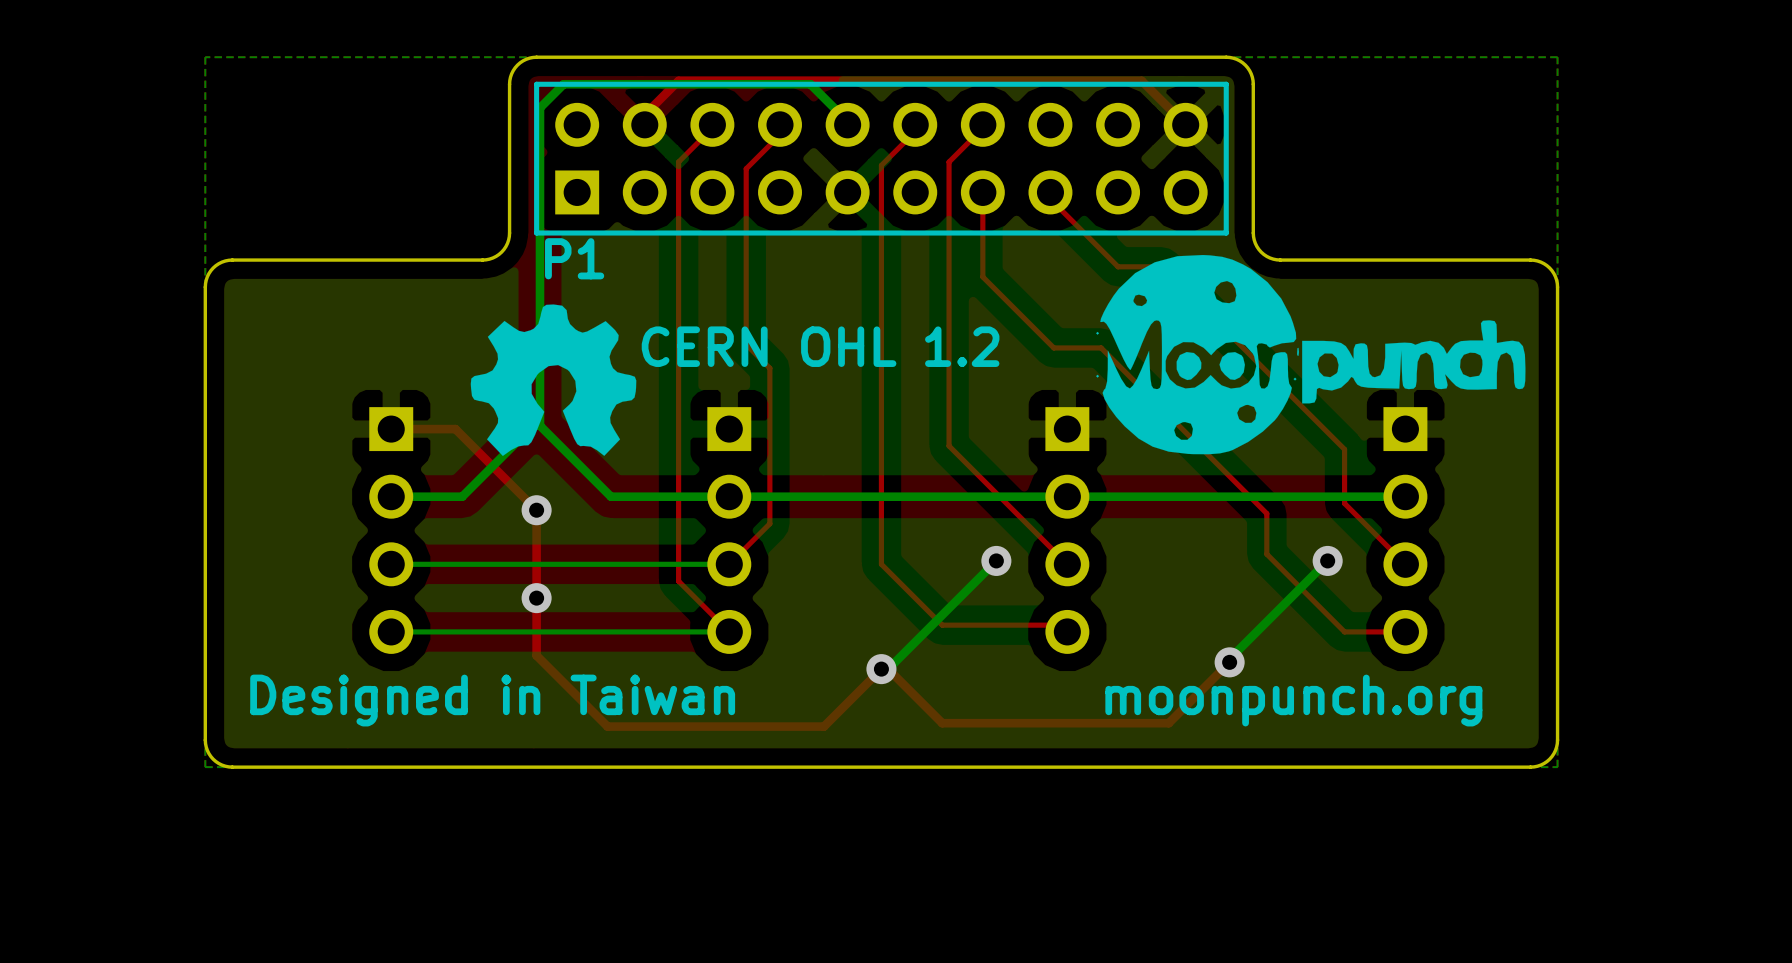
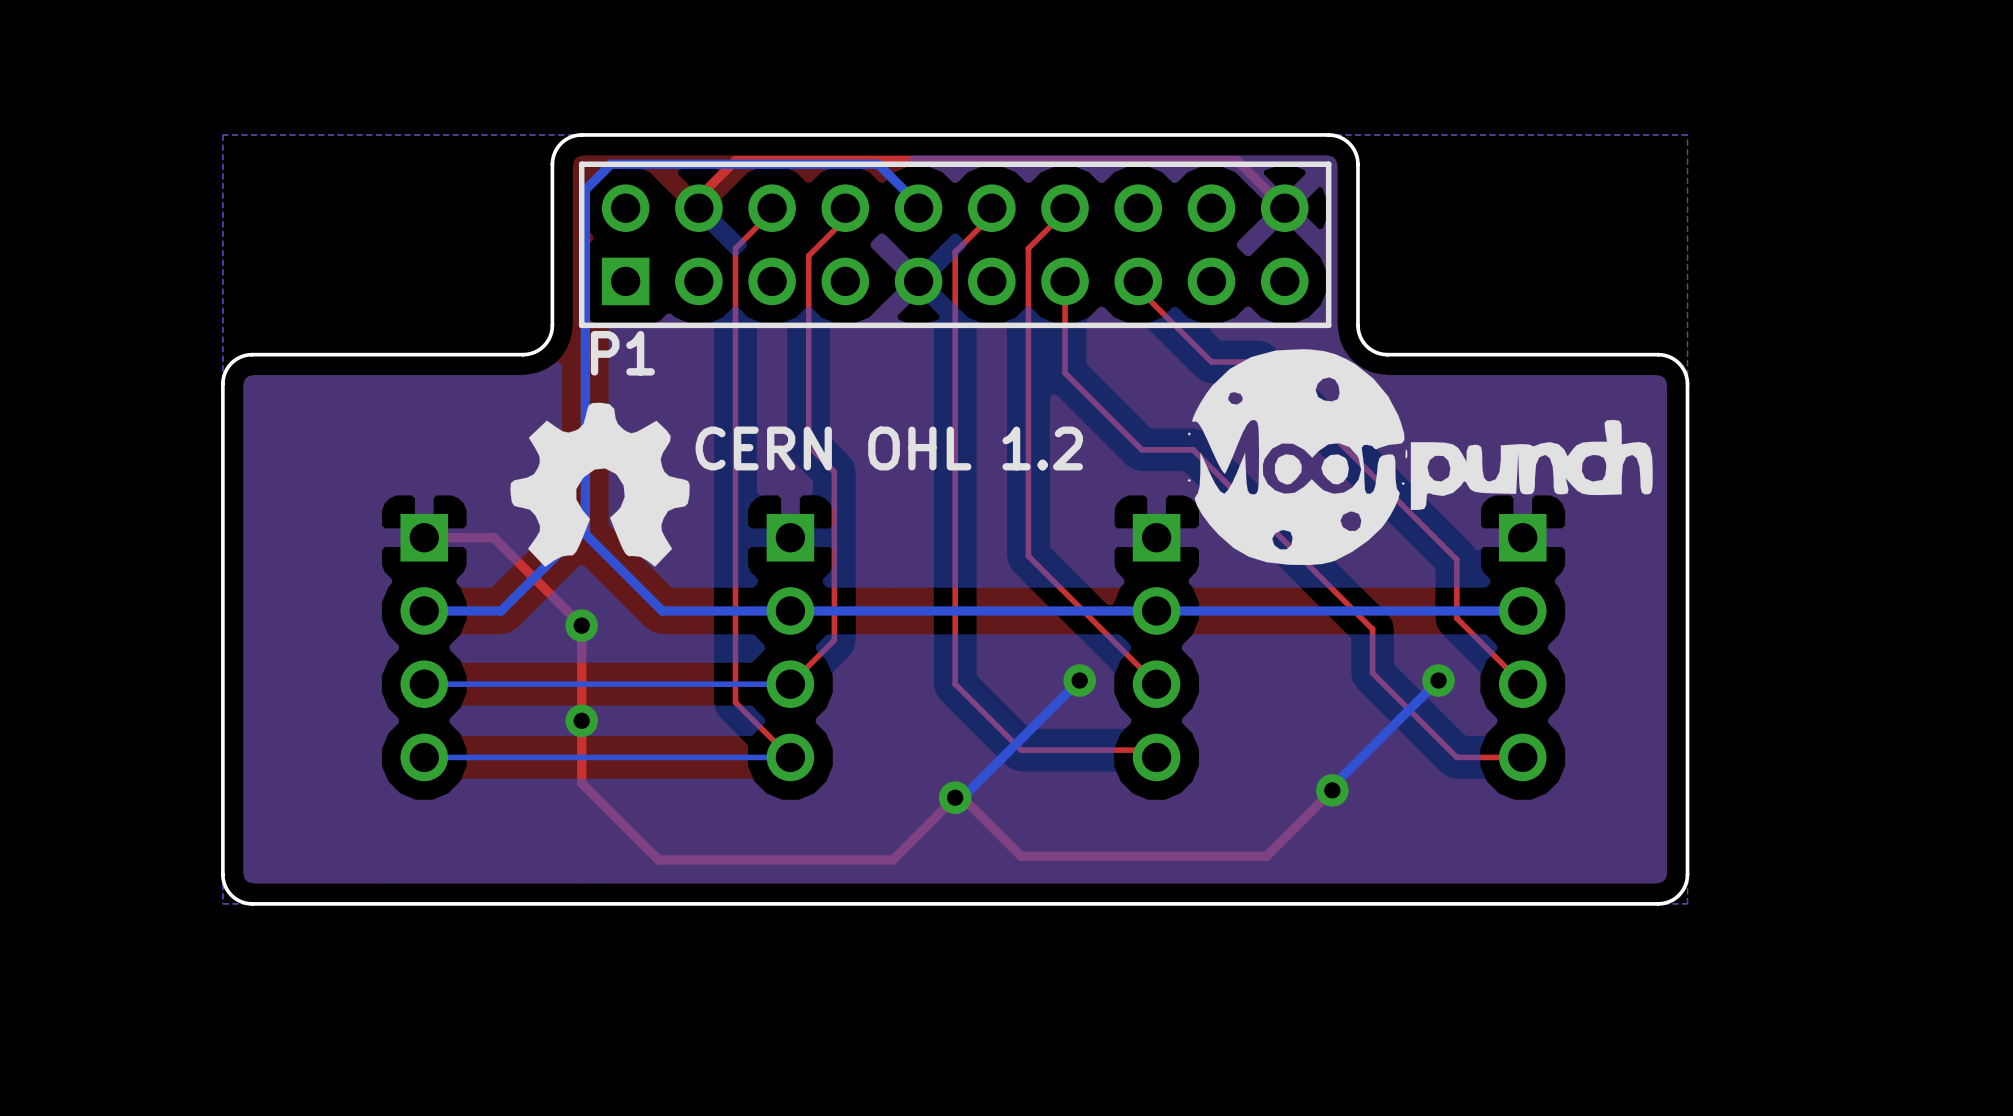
text: Designed in Taiwan (492, 700) -> none
text: moonpunch.org (1293, 700) -> none

